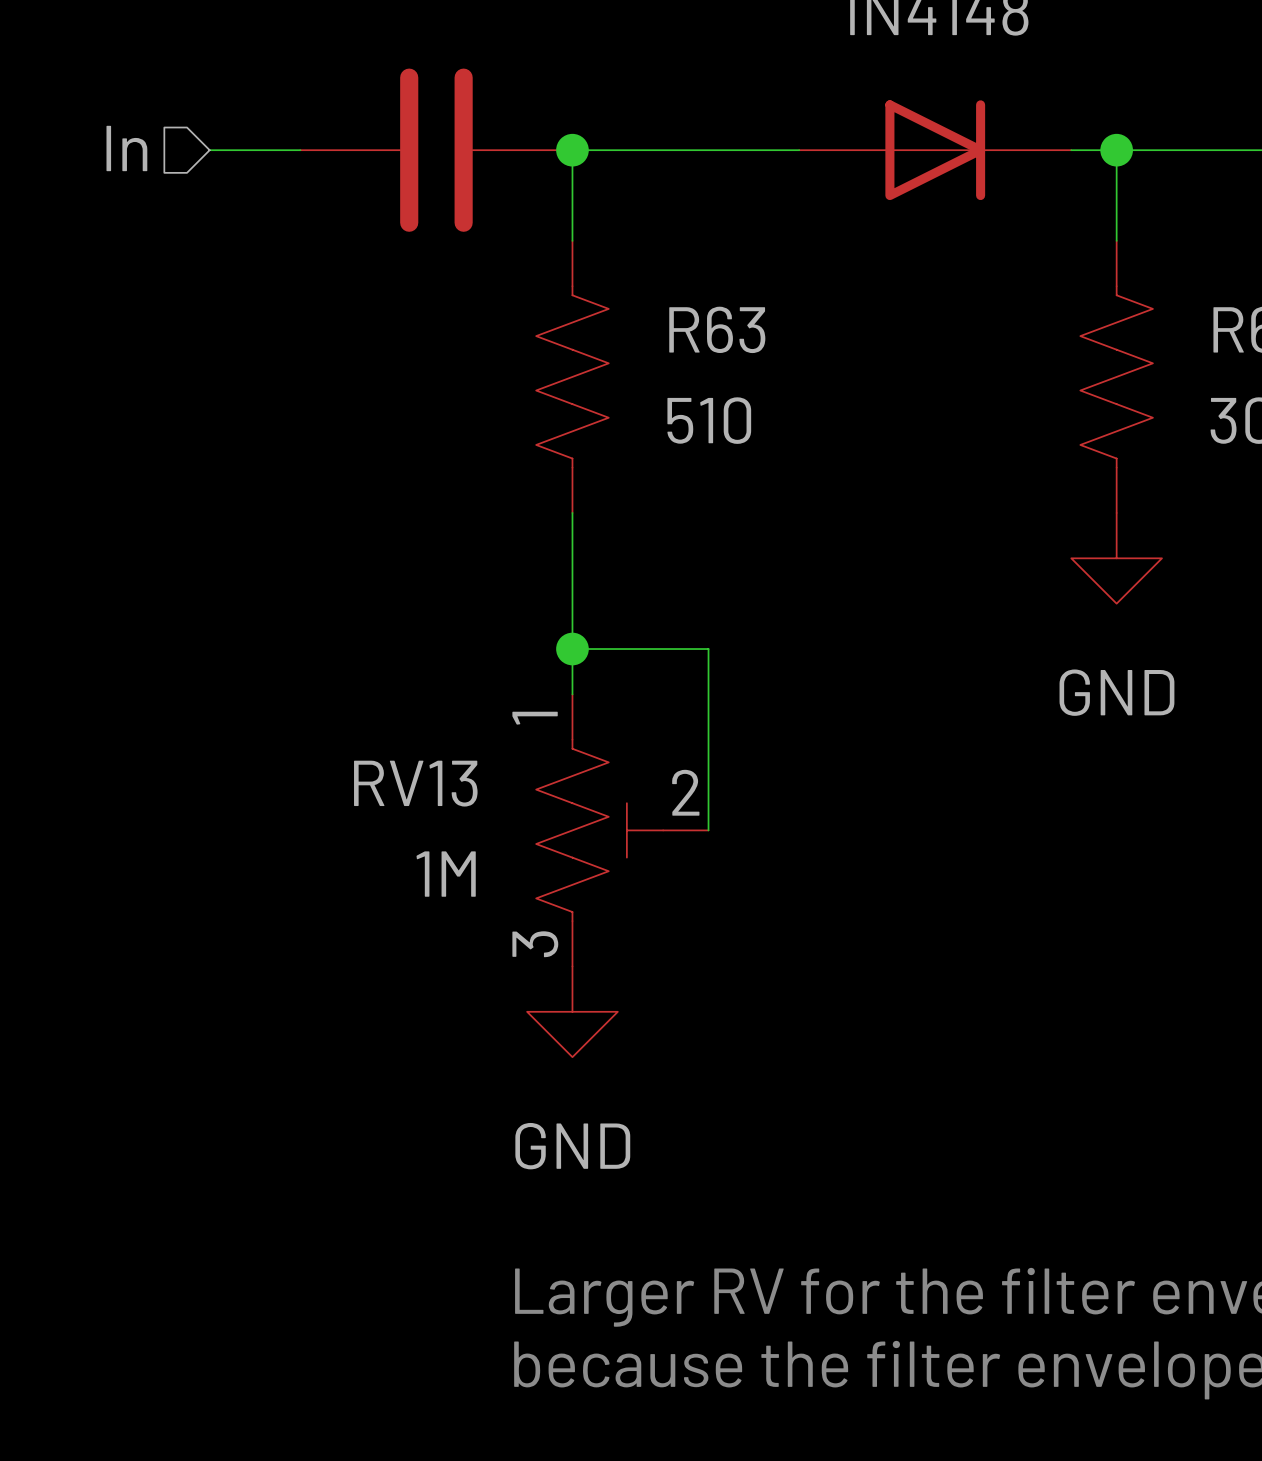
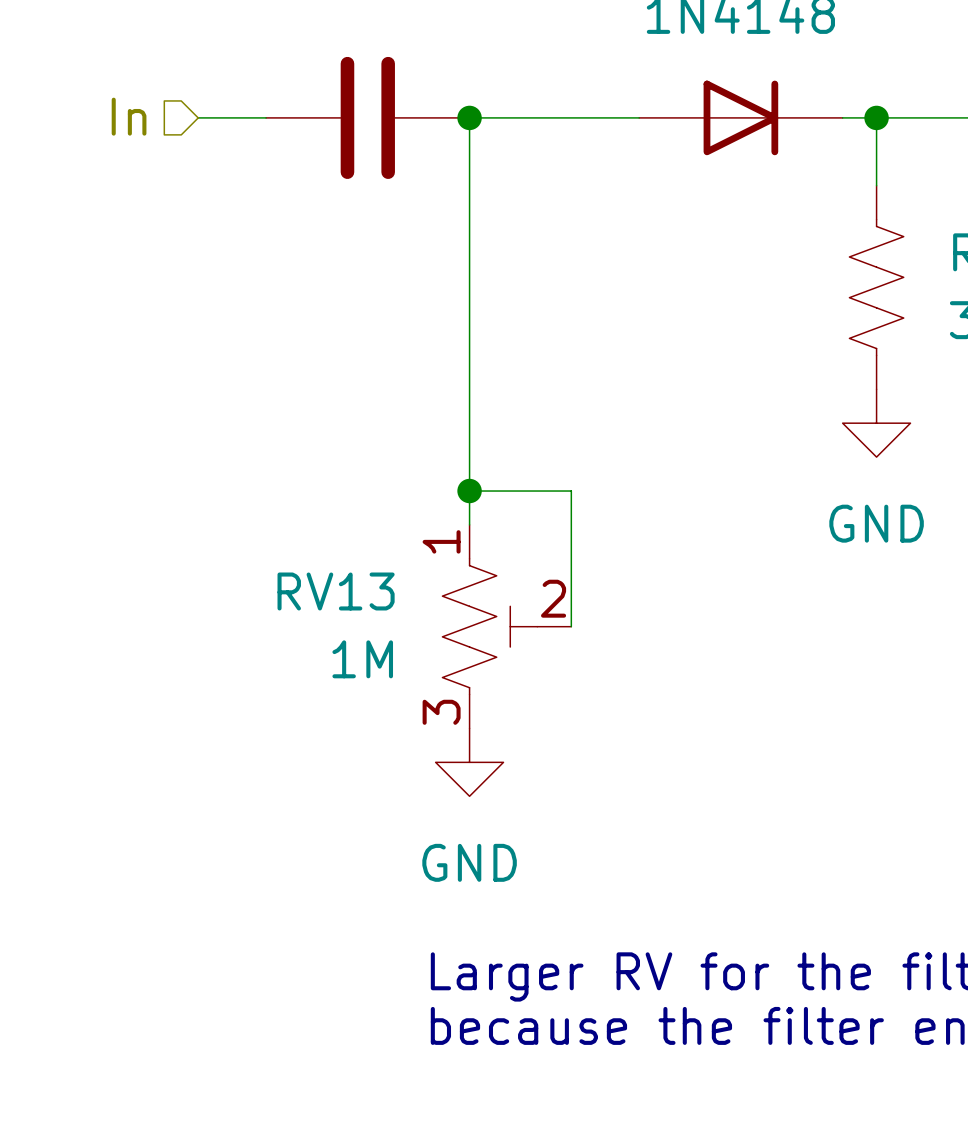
wire: none -> (469, 185) (469, 389)
R63: 510 (572, 376) -> none

